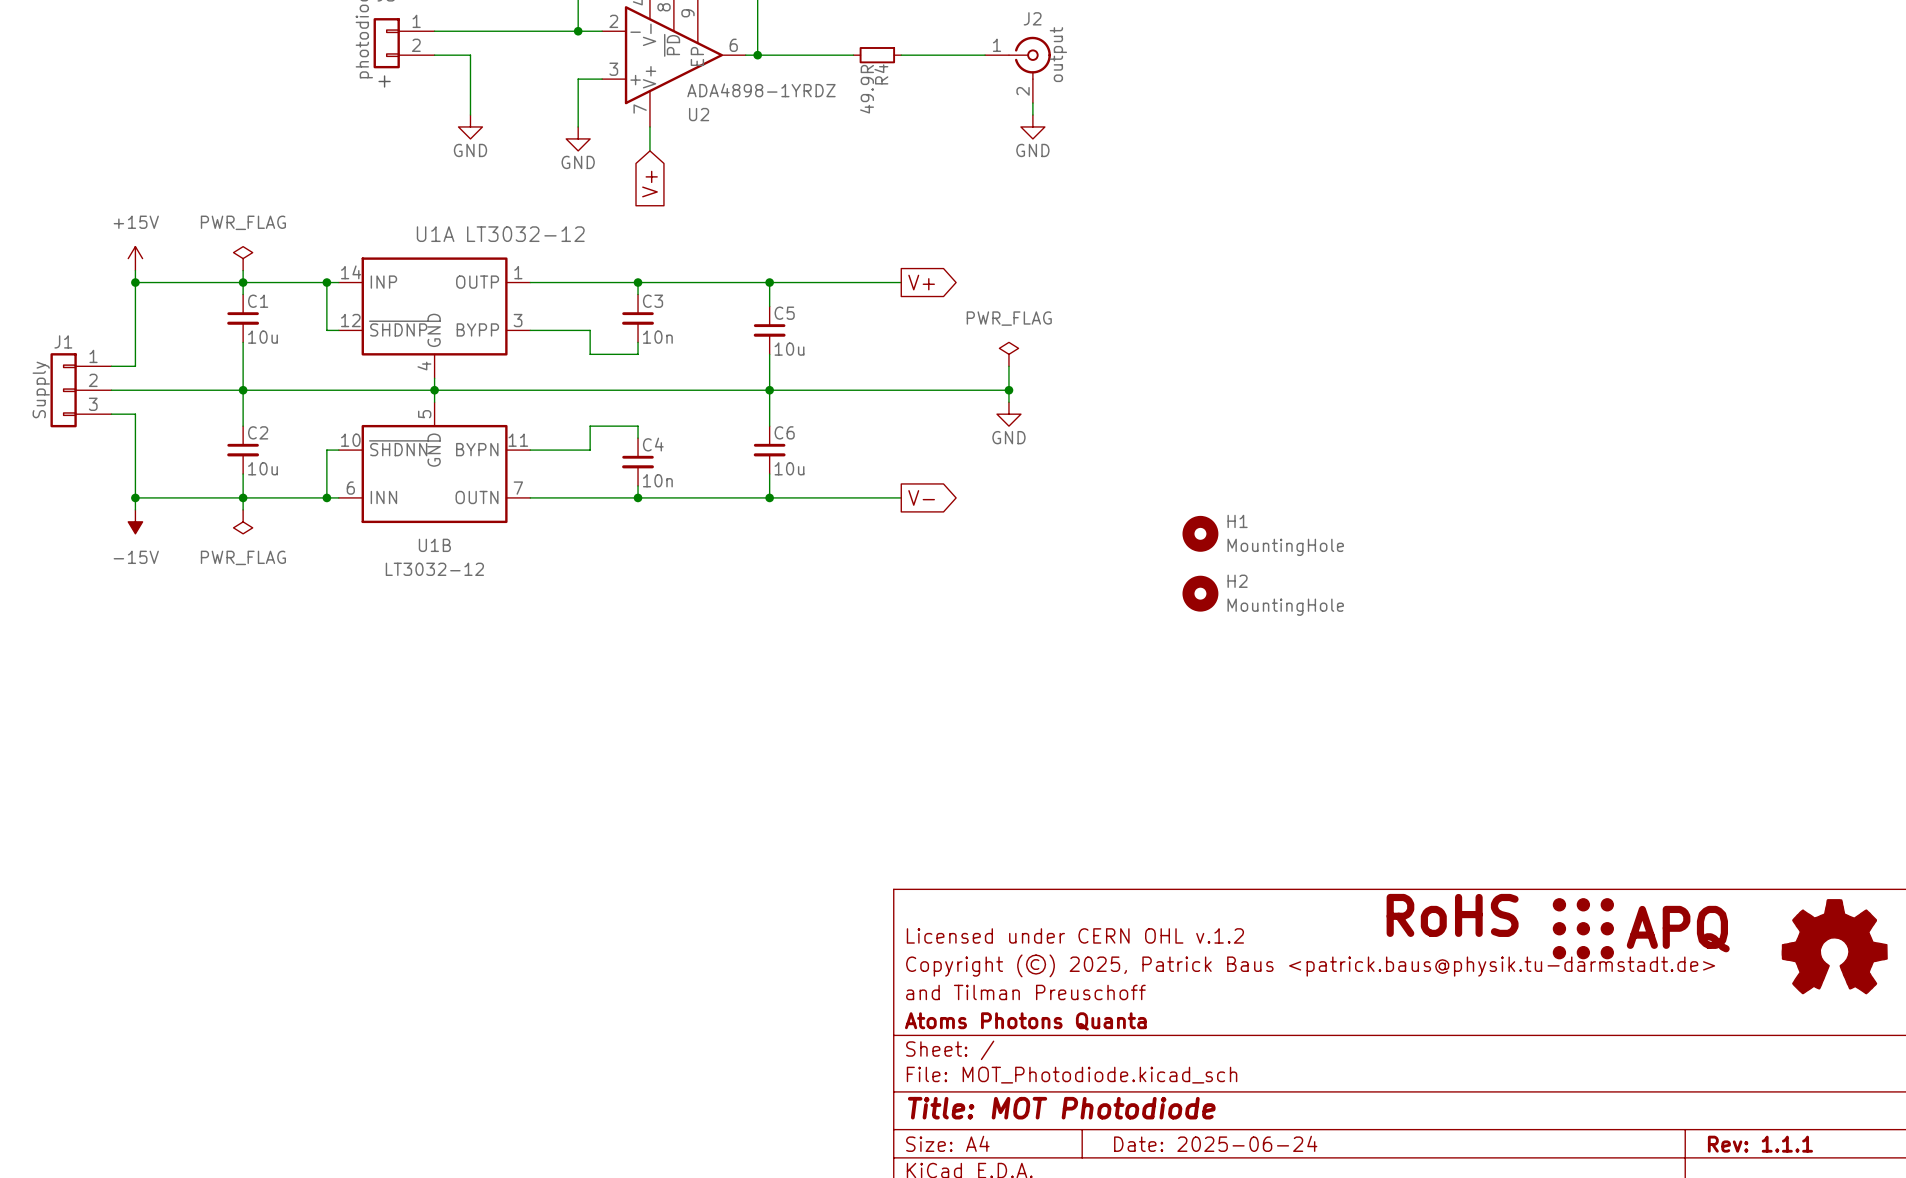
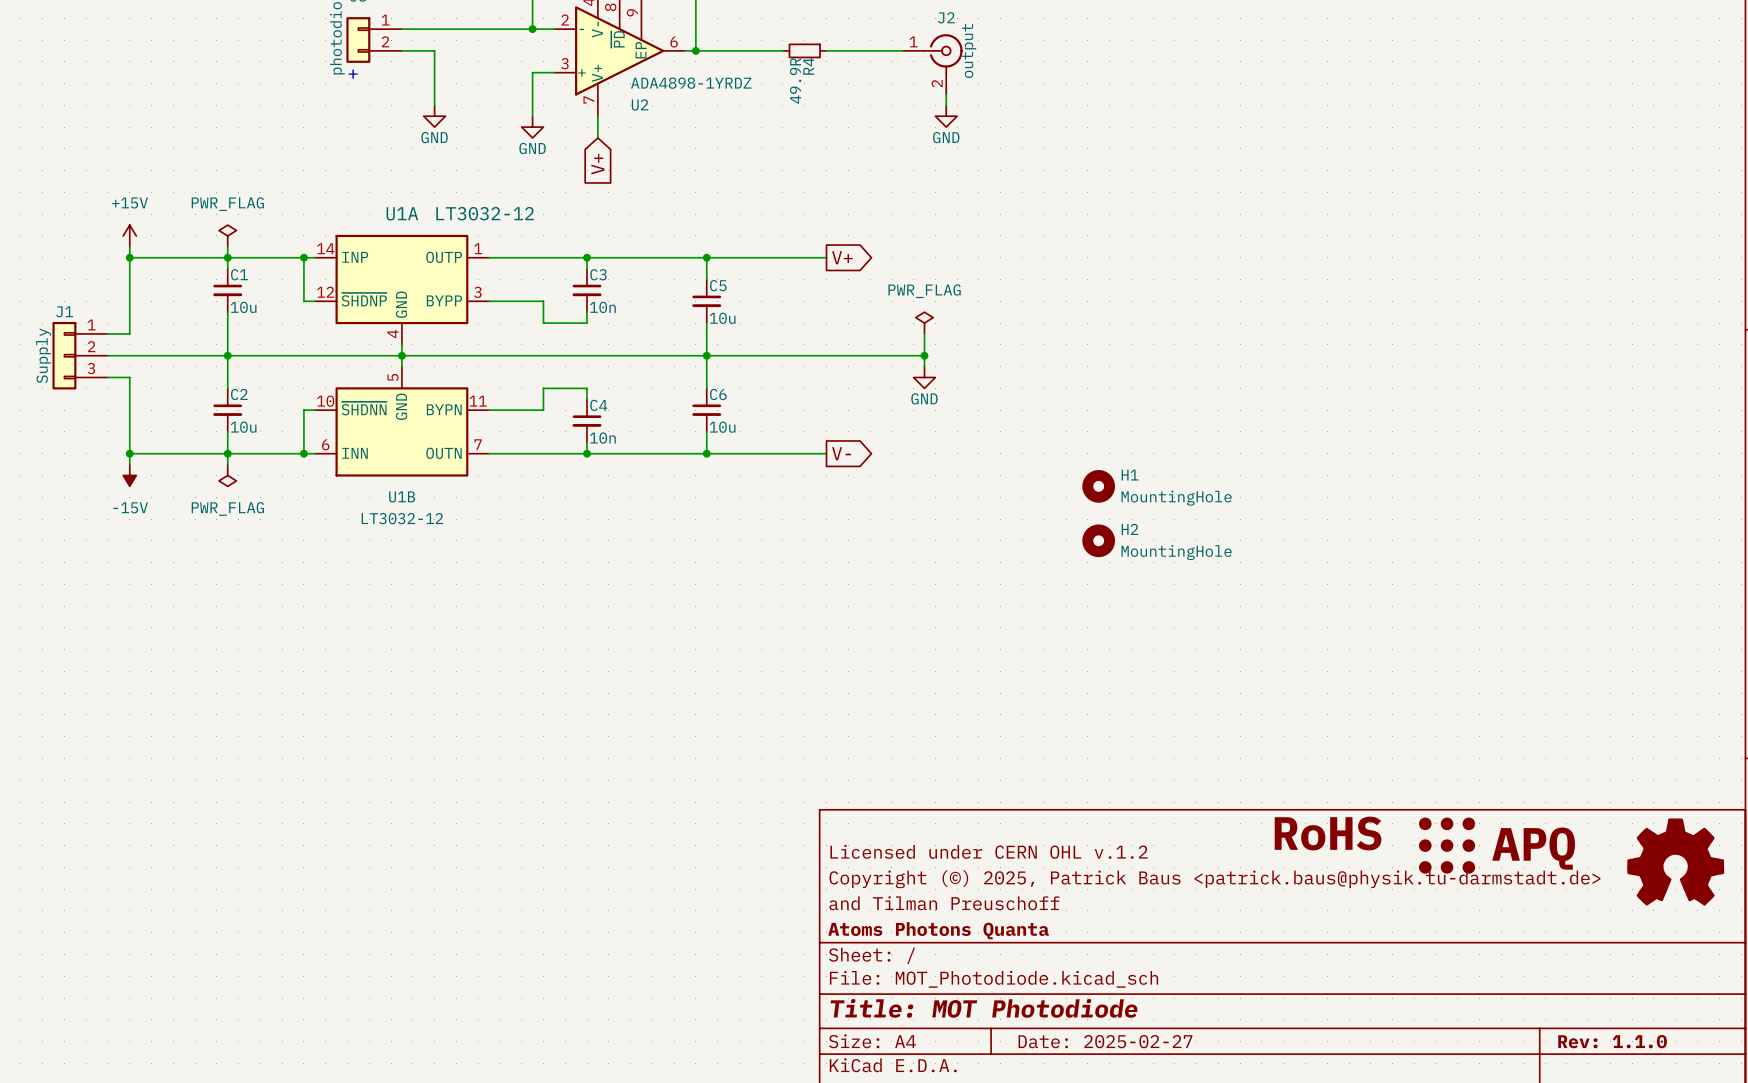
title block: Date: 2025-06-24 (1215, 1143) -> Date: 2025-02-27 (1105, 1041)
title block: Rev: 1.1.1 (1760, 1144) -> Rev: 1.1.0 (1612, 1041)

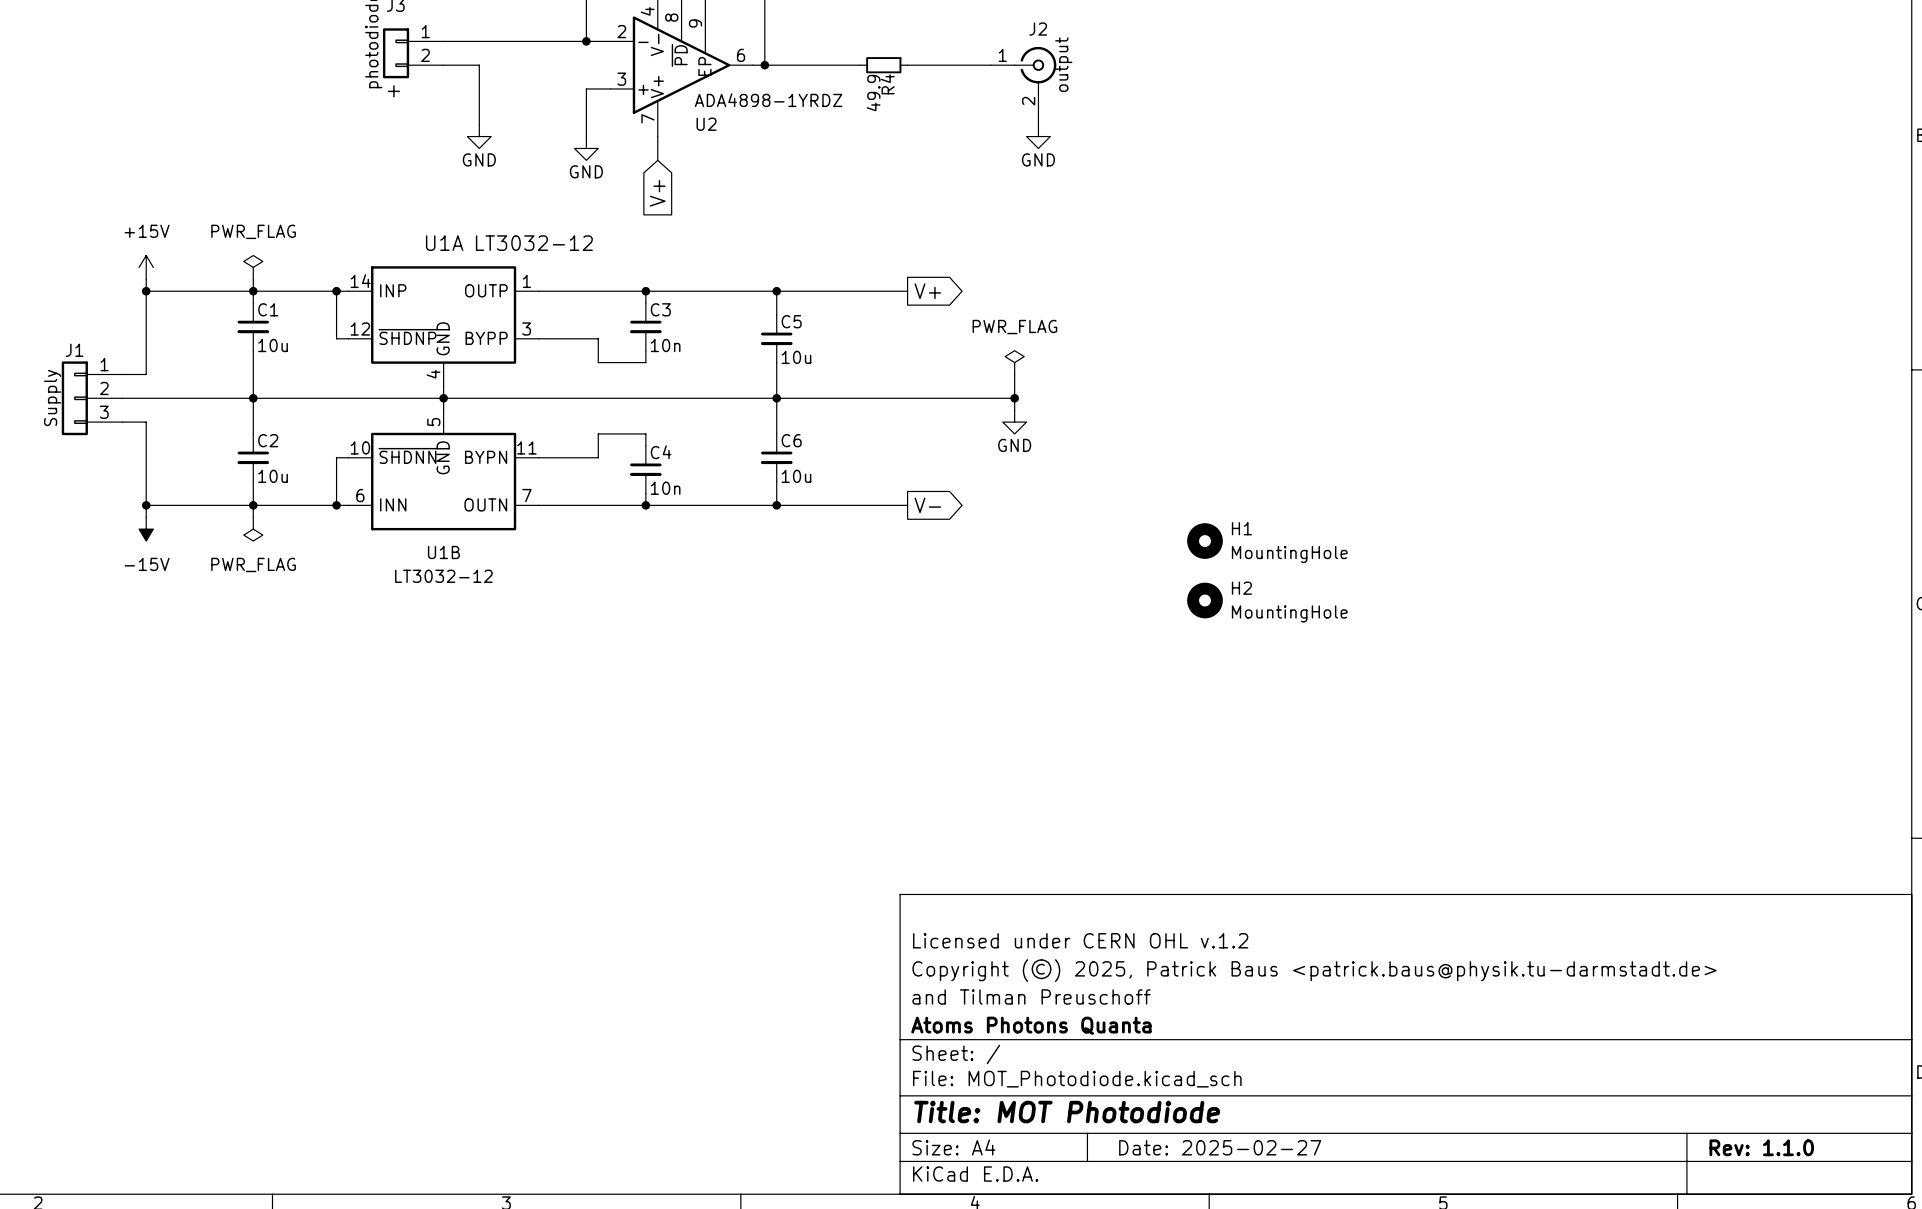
R4 value: 49.9R (795, 80) -> 49.9 (873, 93)
power symbol: (1328, 833) -> none
part: (1447, 845) -> none
part: (1675, 861) -> none

